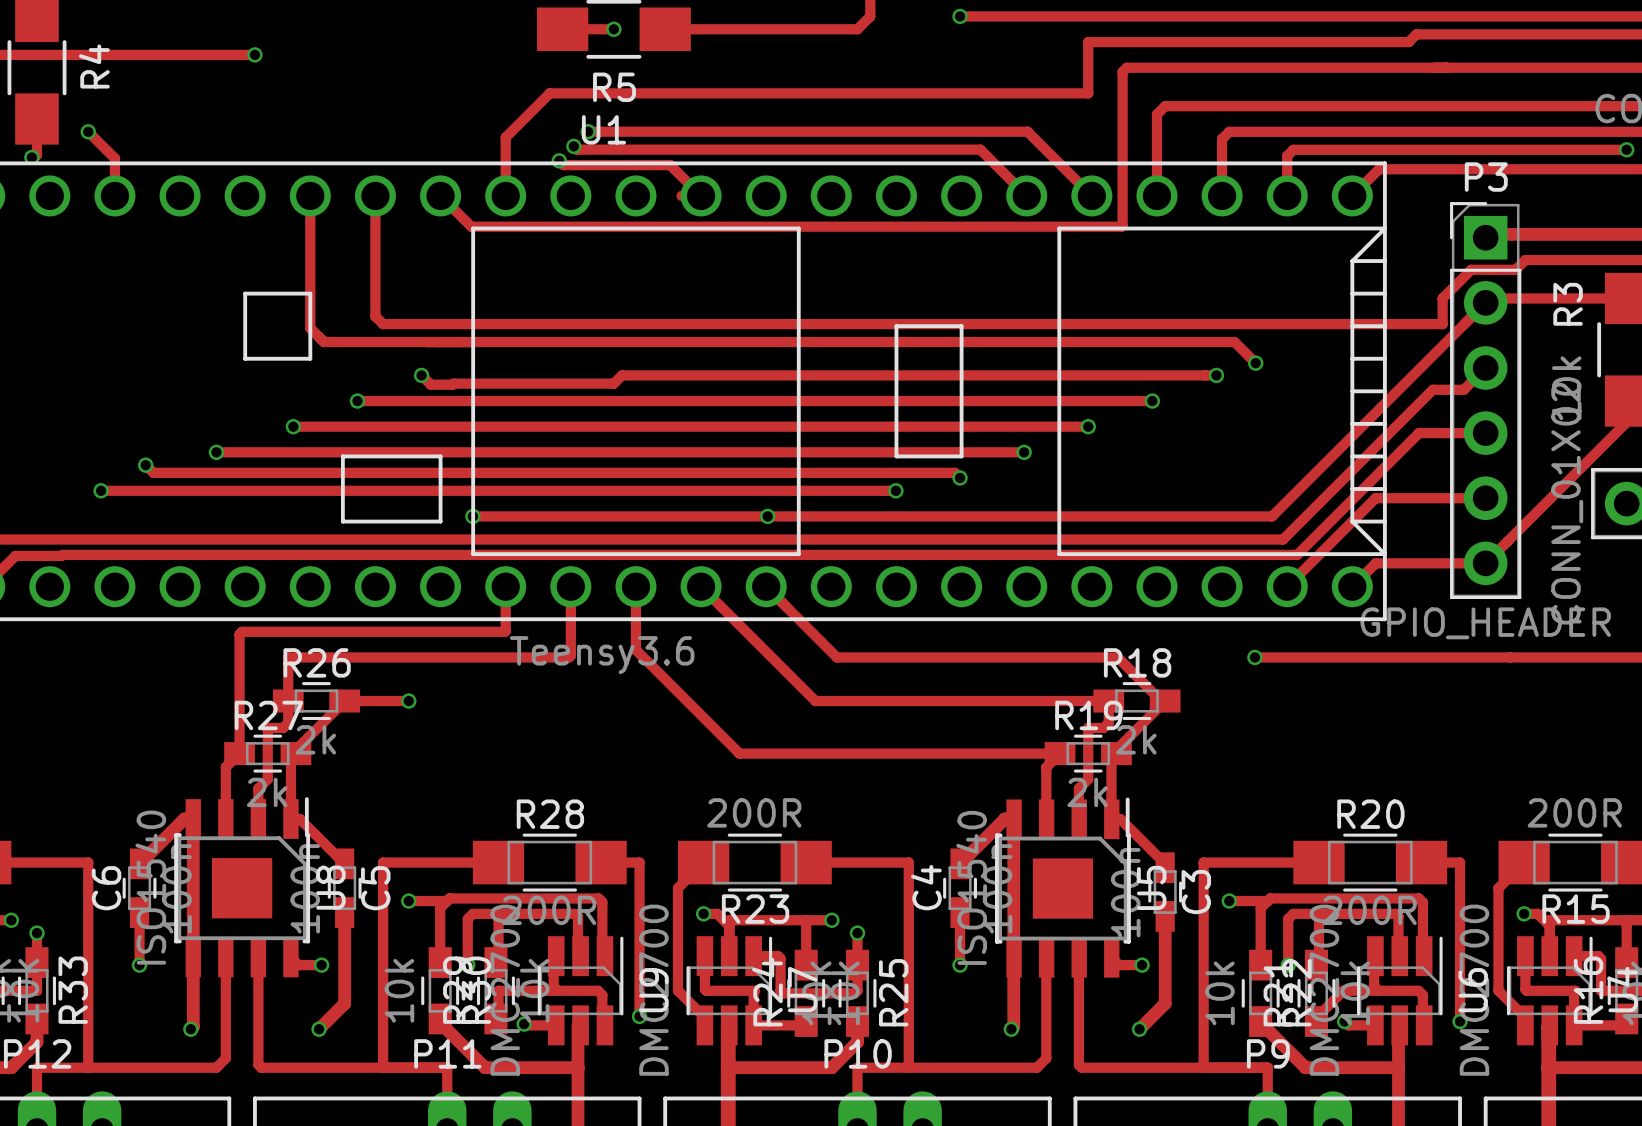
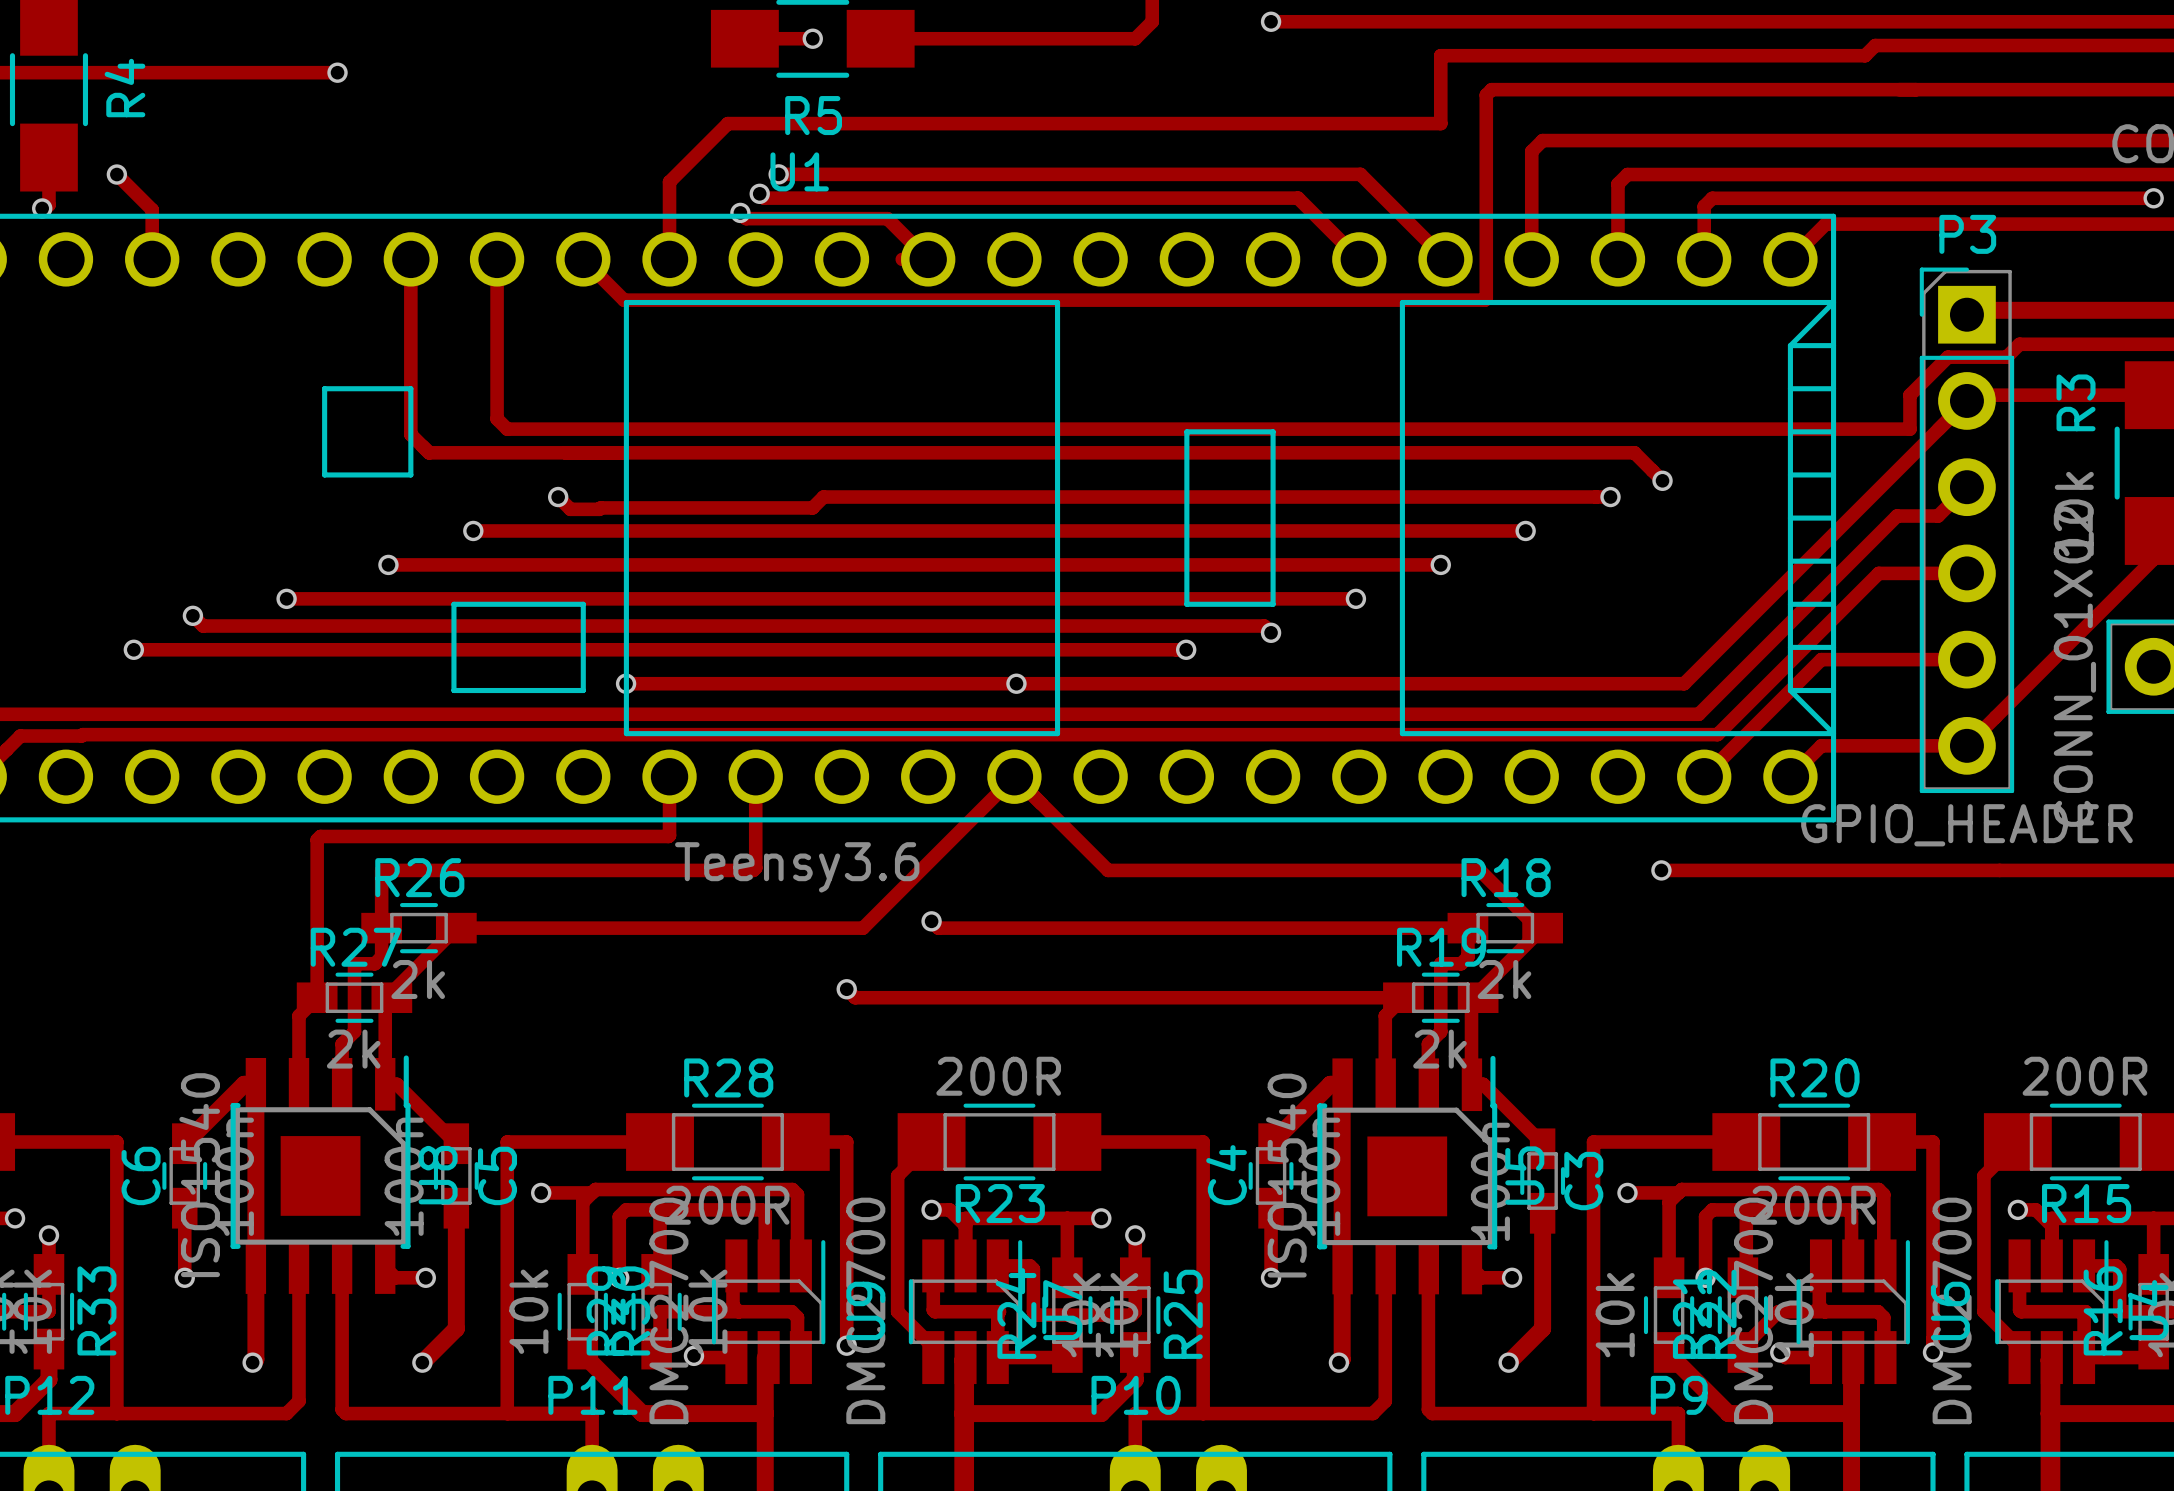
track: (635, 586) (635, 649) (739, 753) -> (846, 989) (855, 997) (979, 997)
track: (701, 586) (815, 701) -> (931, 921) (938, 928) (1079, 928)
track: none -> (1014, 776) (863, 928) (541, 928)
via: none -> (931, 921)
via: (408, 701) -> none
via: none -> (846, 989)

